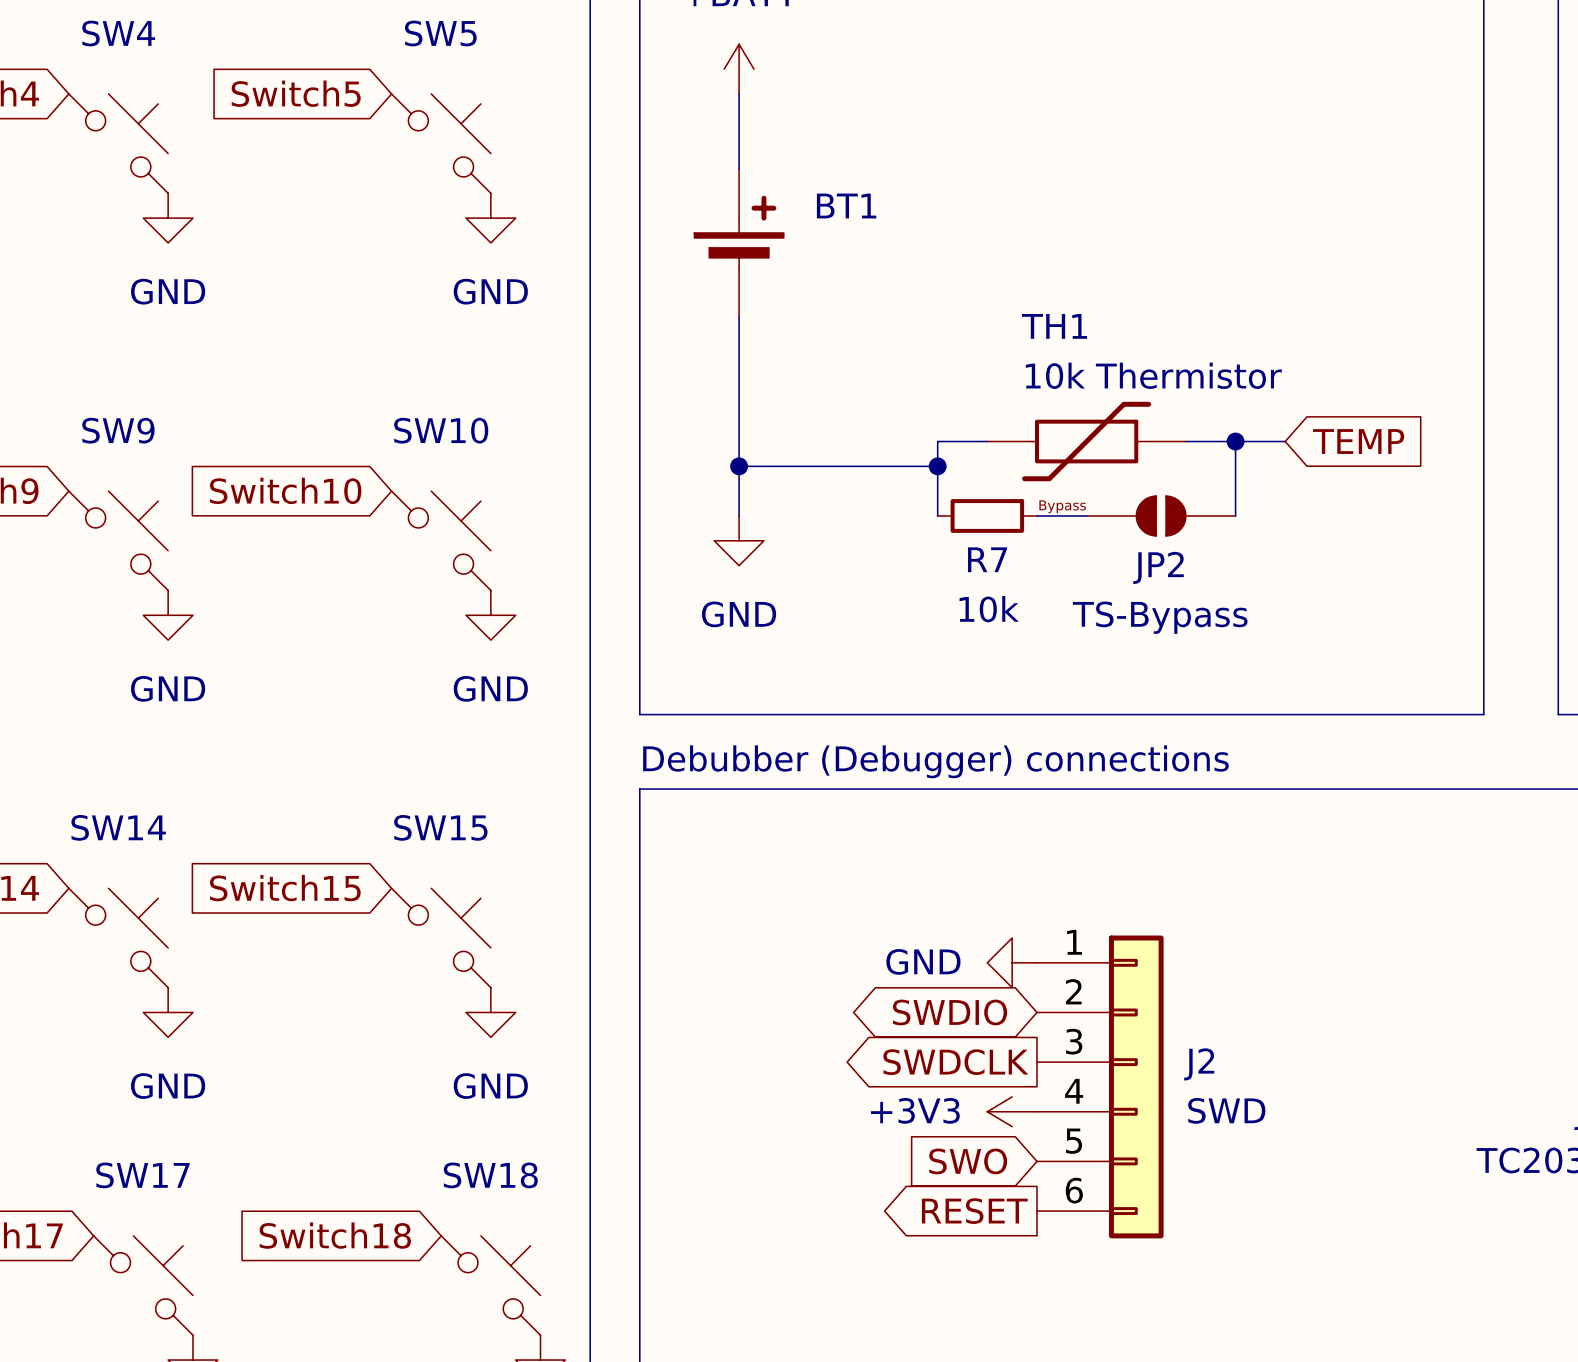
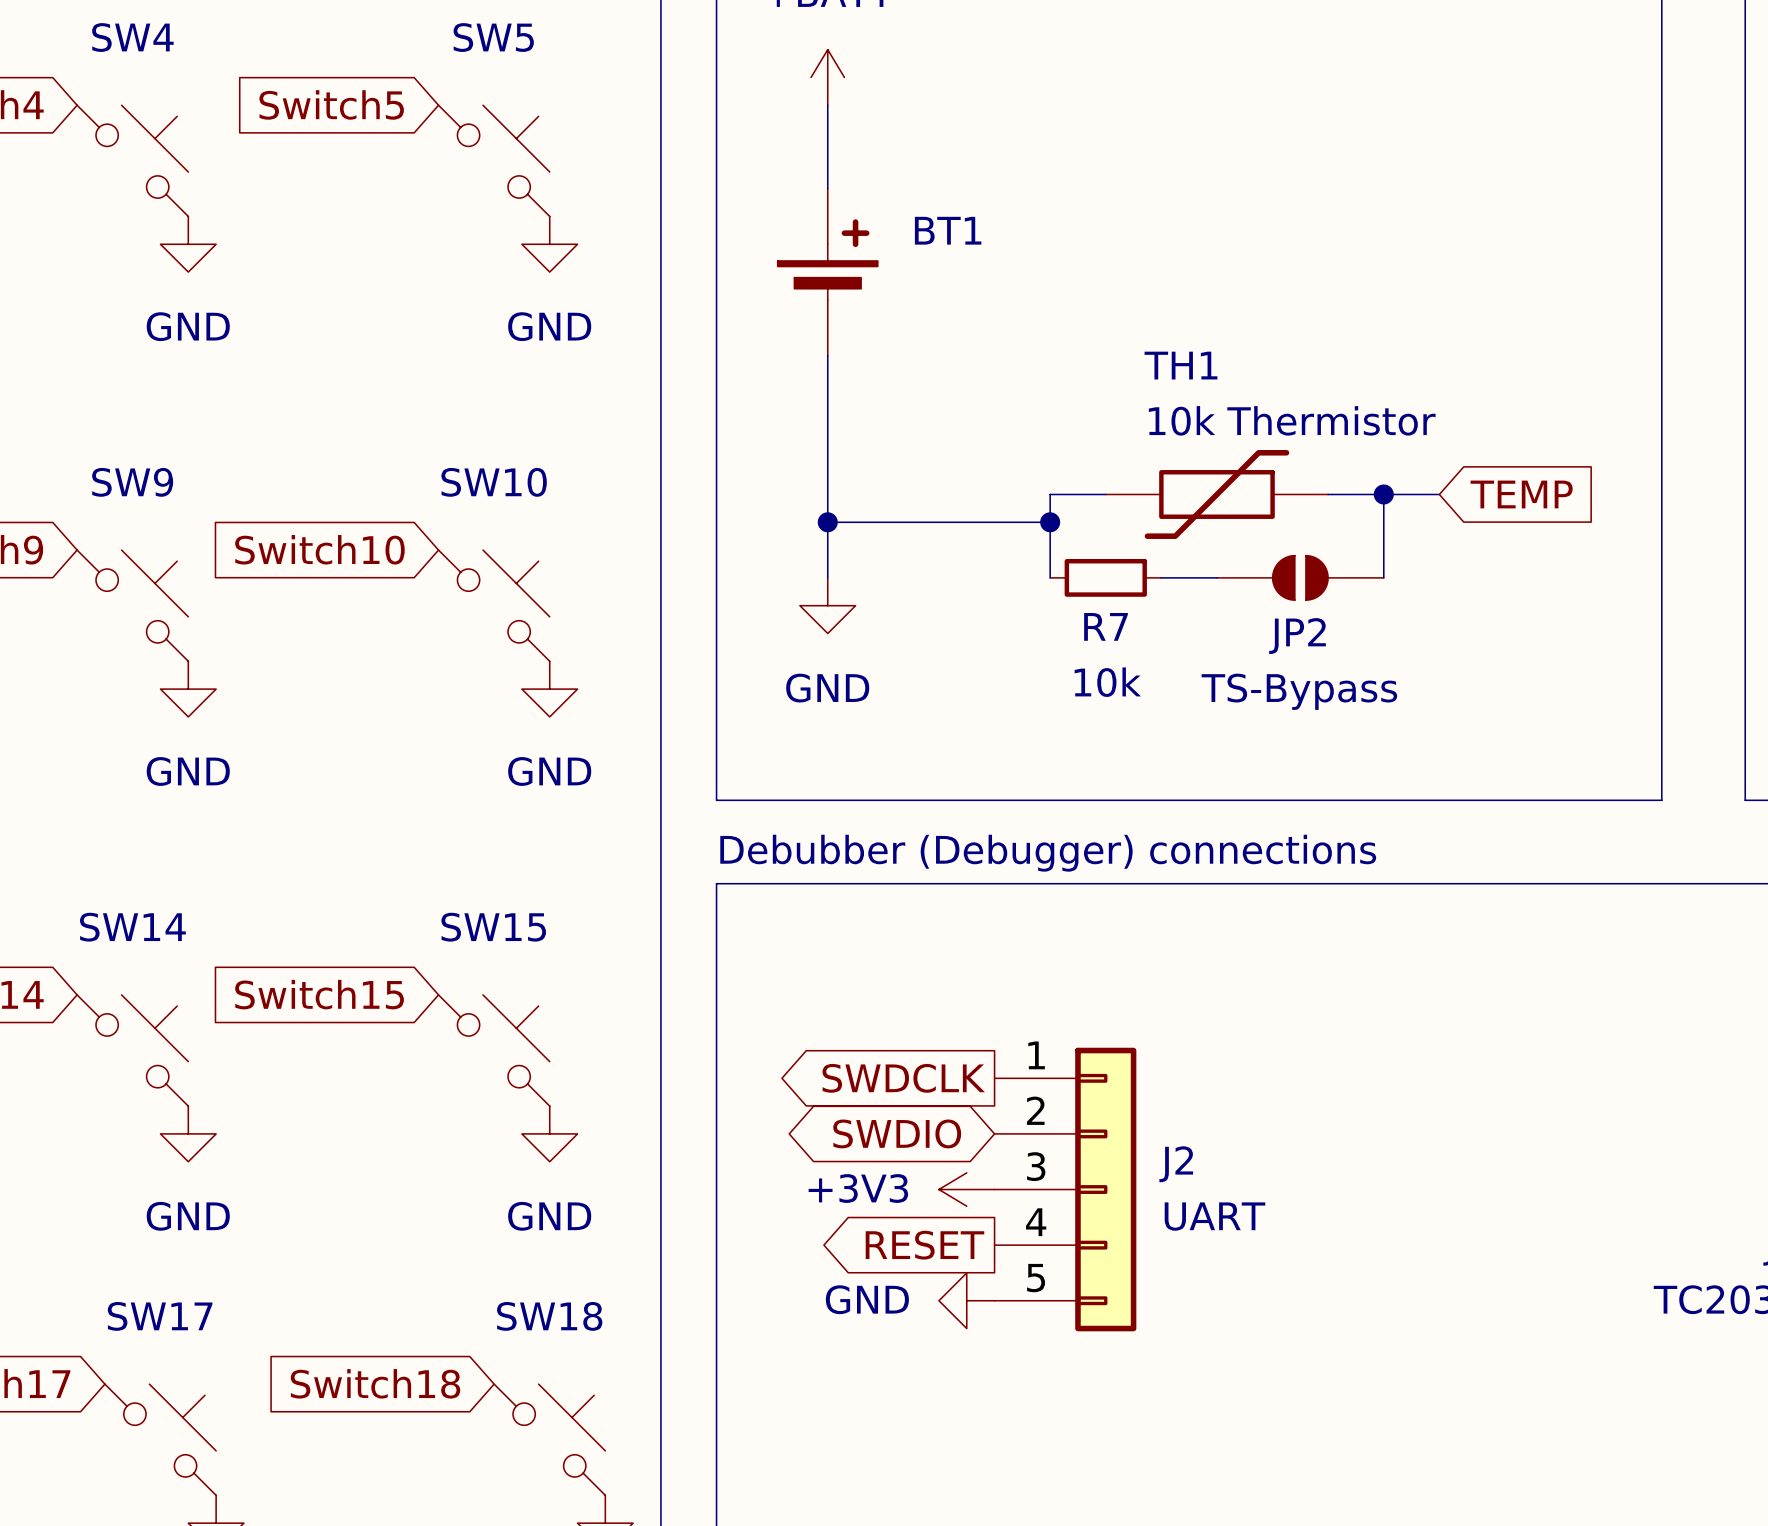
label: Bypass (1062, 506) -> none
J2 symbol: [1036, 935, 1164, 1239] -> [994, 1047, 1137, 1332]
power symbol position: GND (1012, 962) -> GND (966, 1300)
global label position: SWDIO (950, 1012) -> SWDIO (897, 1133)
global label position: SWDCLK (955, 1062) -> SWDCLK (903, 1078)
J2 value: SWD (1226, 1110) -> UART (1214, 1216)
power symbol position: +3V3 (1012, 1111) -> +3V3 (966, 1189)
global label: SWO (968, 1161) -> none
global label position: RESET (974, 1211) -> RESET (924, 1245)

